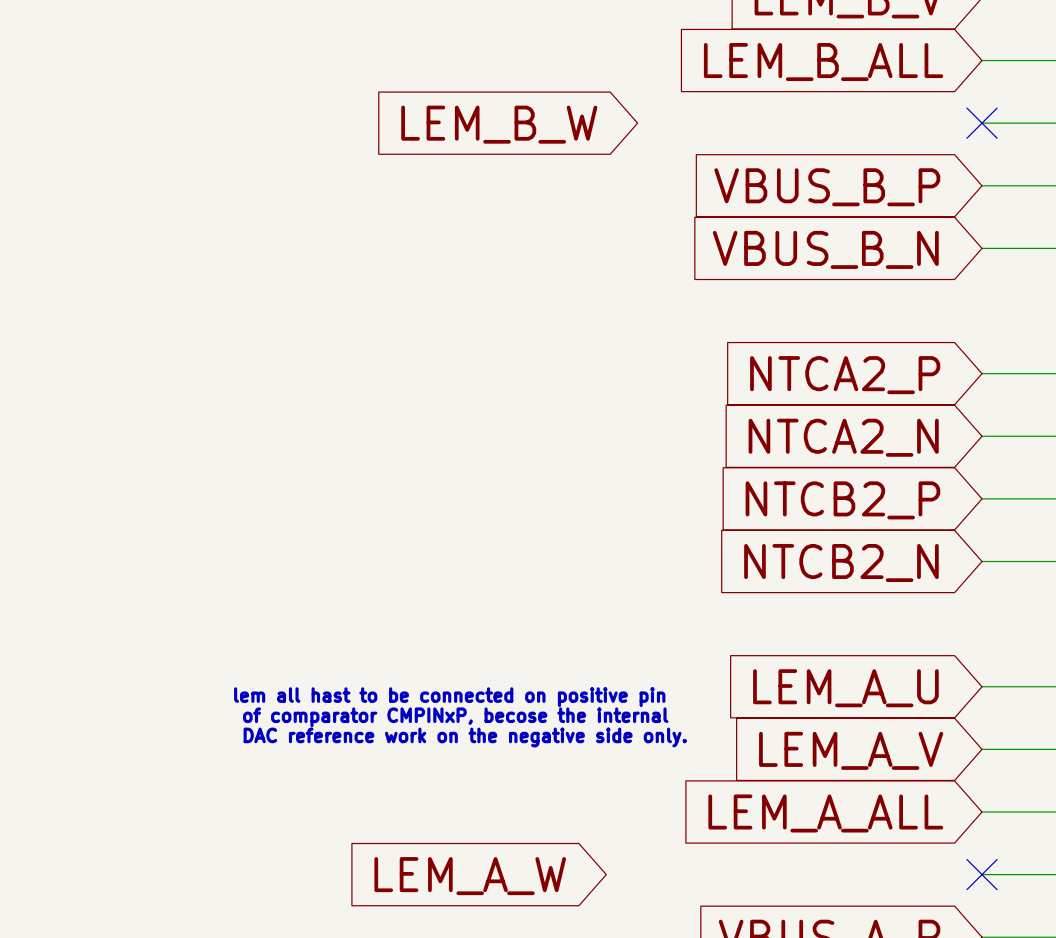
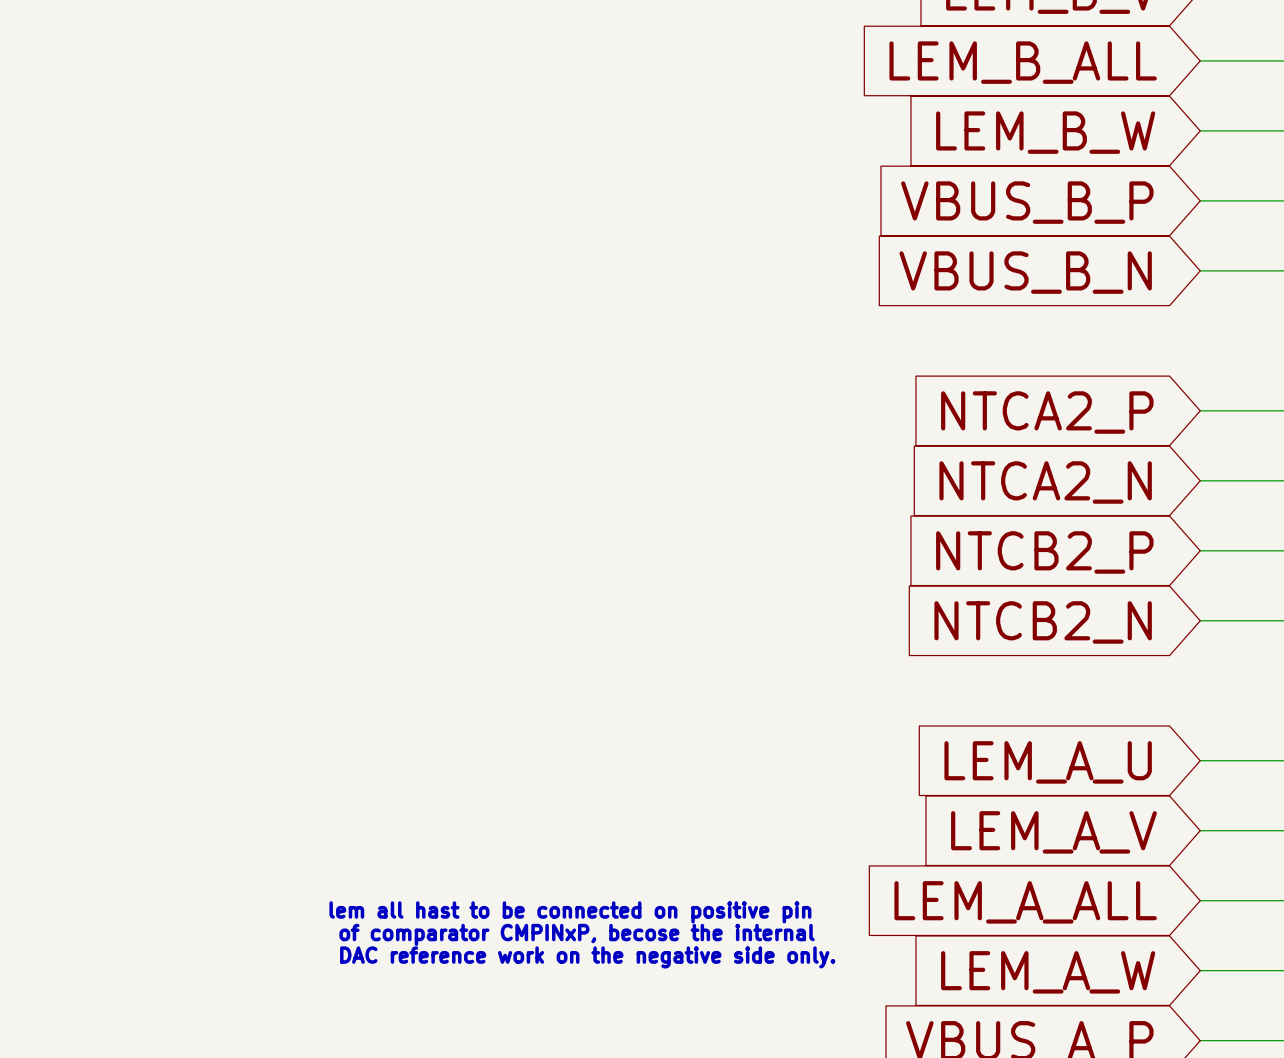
no-connect mark: (982, 123) -> none
global label position: LEM_B_W (499, 124) -> LEM_B_W (1045, 132)
text position: lem all hast to be connected on positive pin (449, 697) -> lem all hast to be connected on positive pin (570, 912)
text position: of comparator CMPINxP, becose the internal (455, 717) -> of comparator CMPINxP, becose the internal (577, 934)
text position: DAC reference work on the negative side only. (465, 737) -> DAC reference work on the negative side only. (587, 957)
no-connect mark: (982, 874) -> none
global label position: LEM_A_W (470, 876) -> LEM_A_W (1048, 972)

